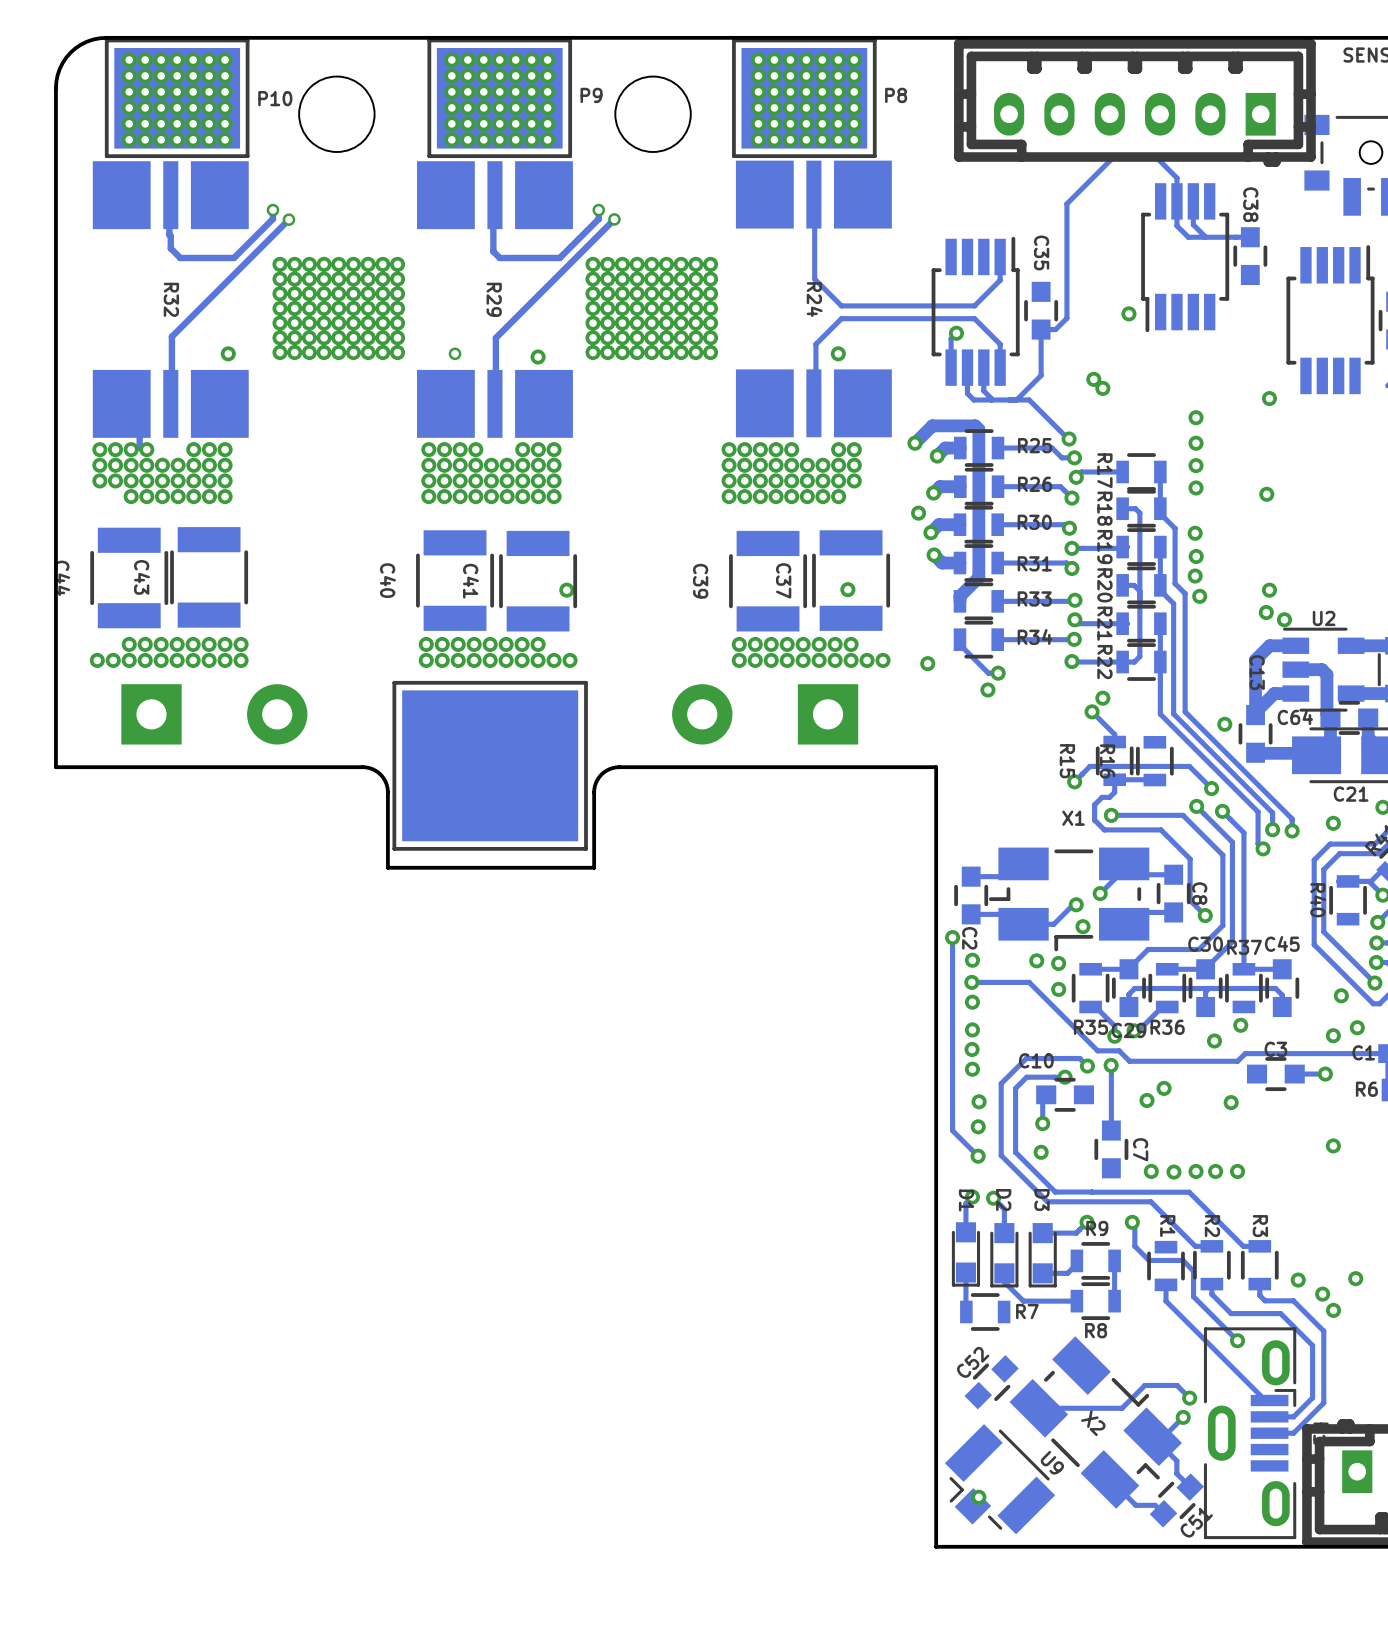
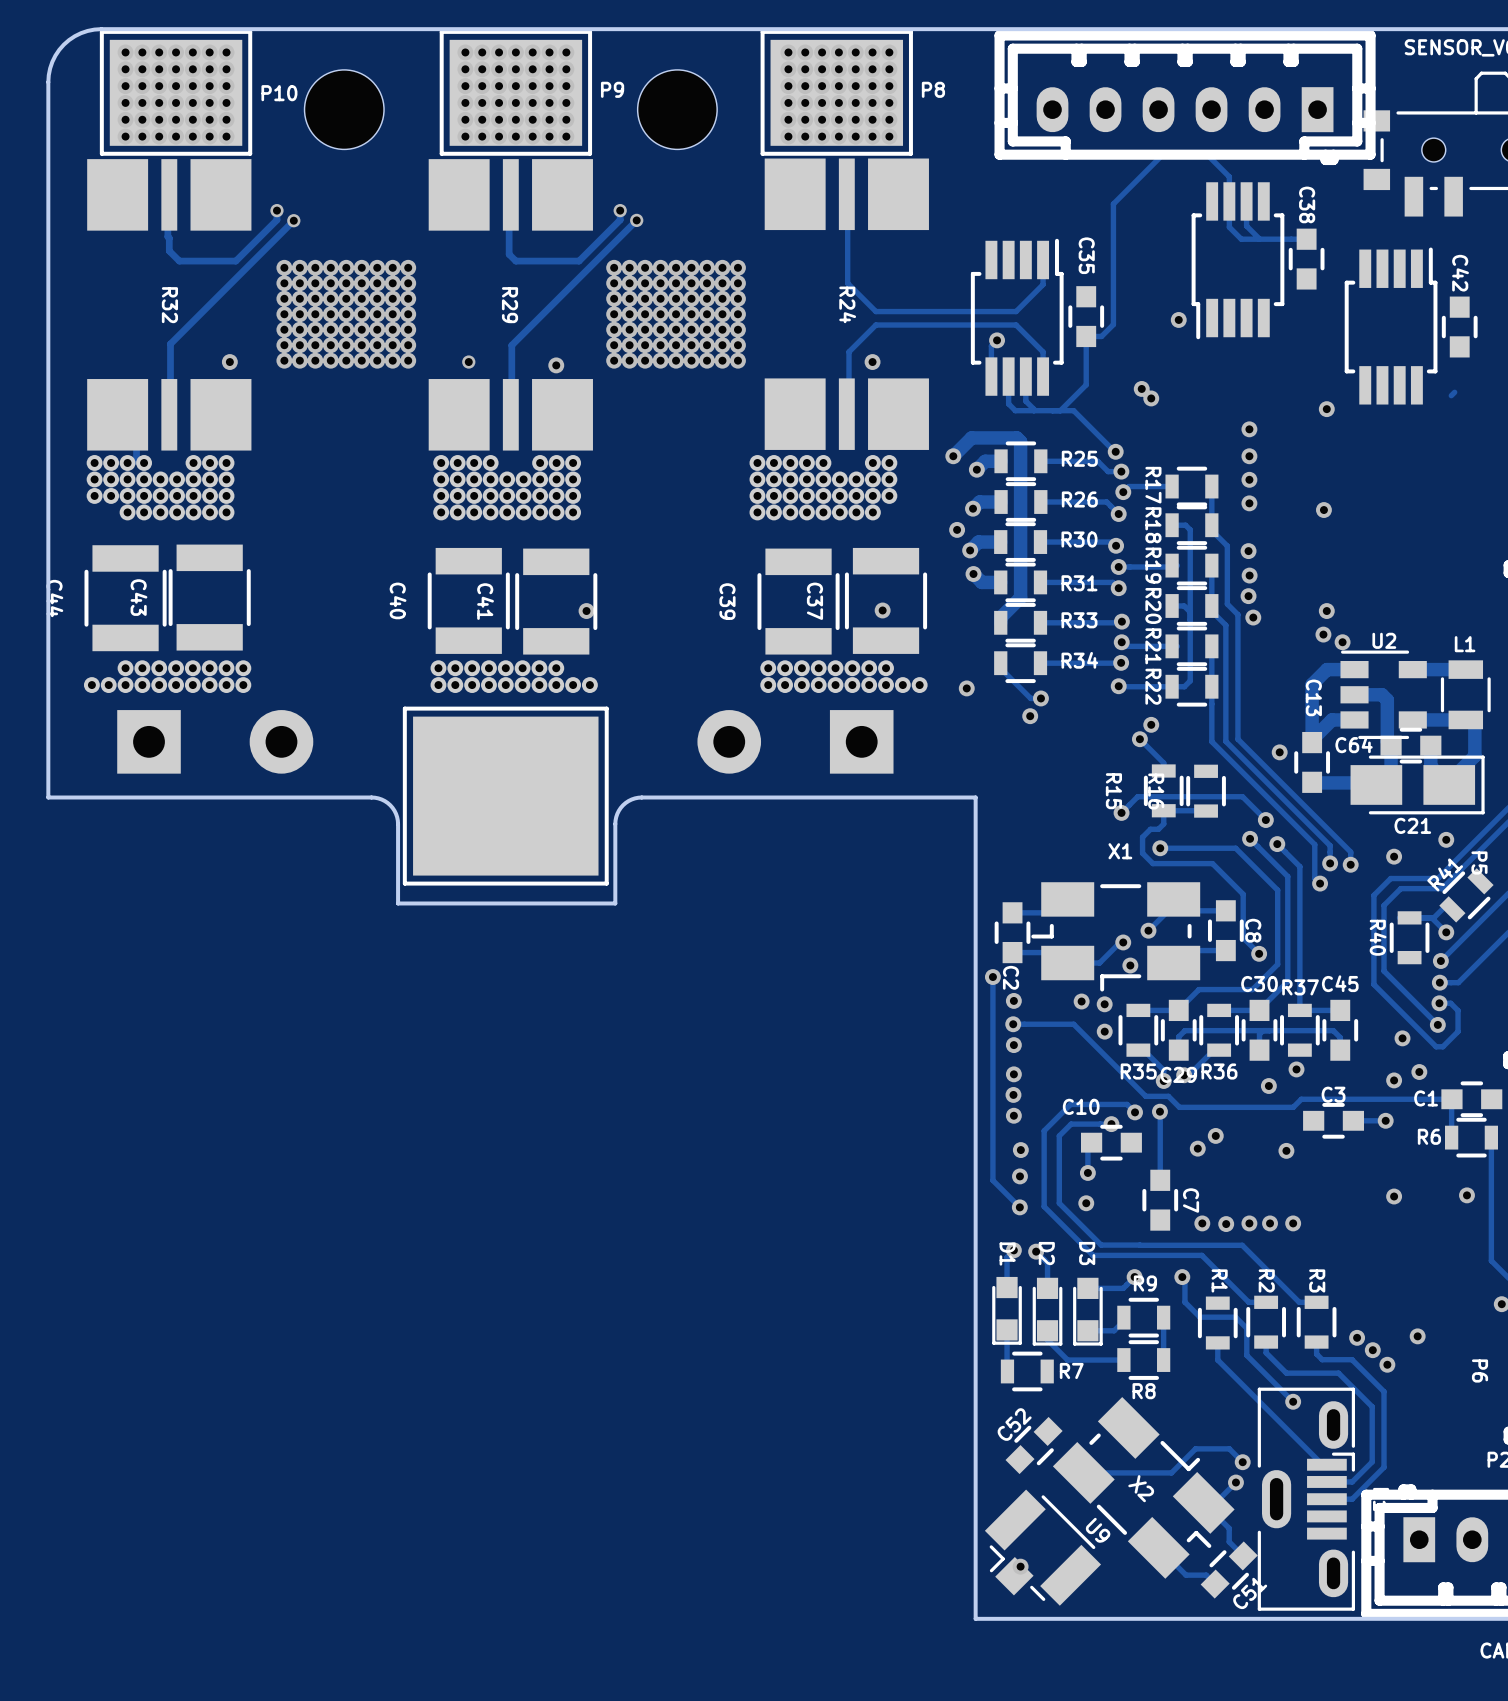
via: none -> (1372, 1350)
via: (1322, 1294) -> none
via: none -> (1387, 1364)
via: (1333, 1310) -> none

